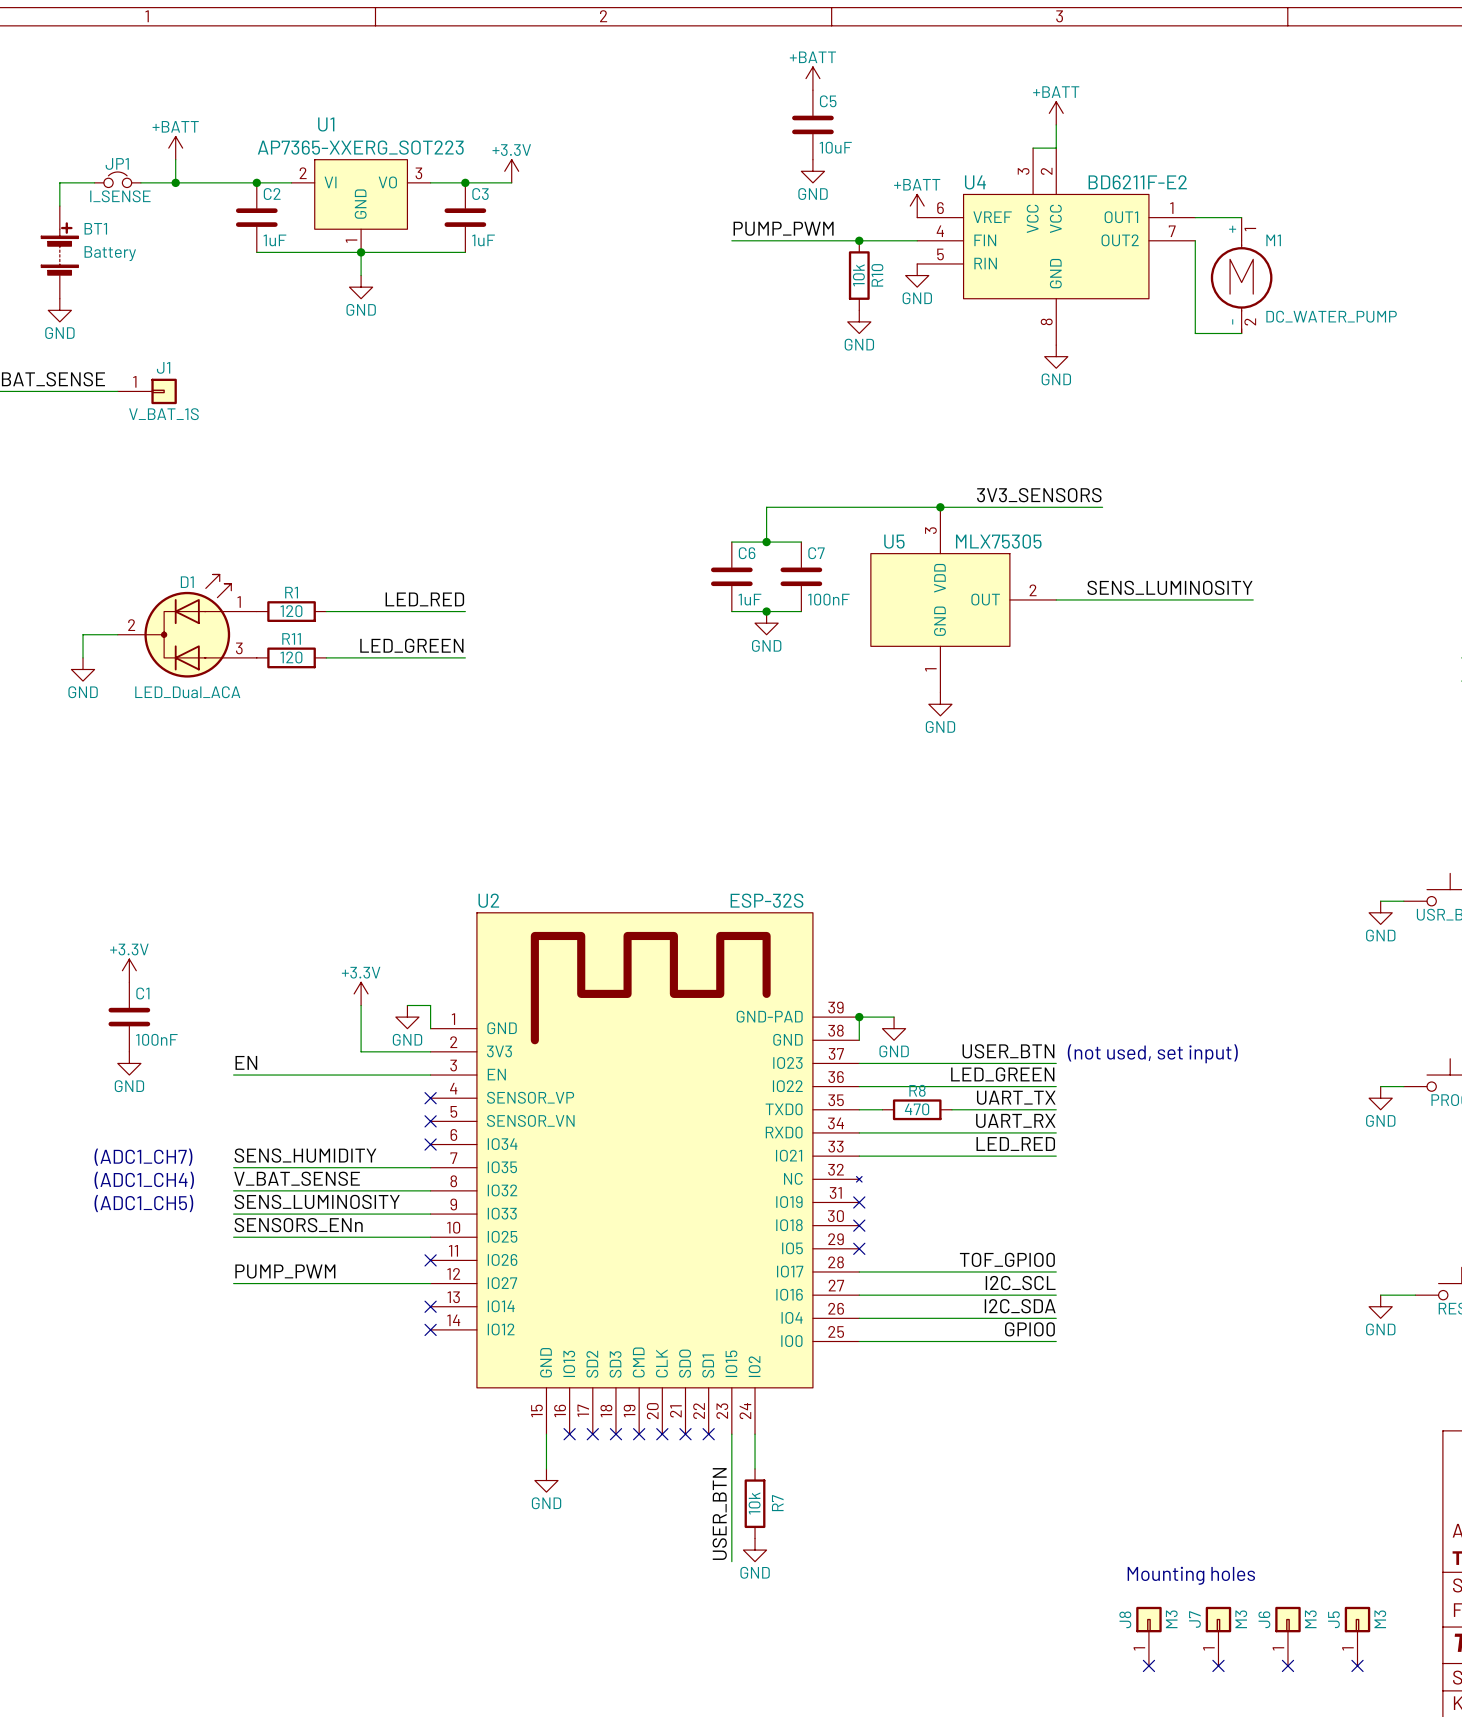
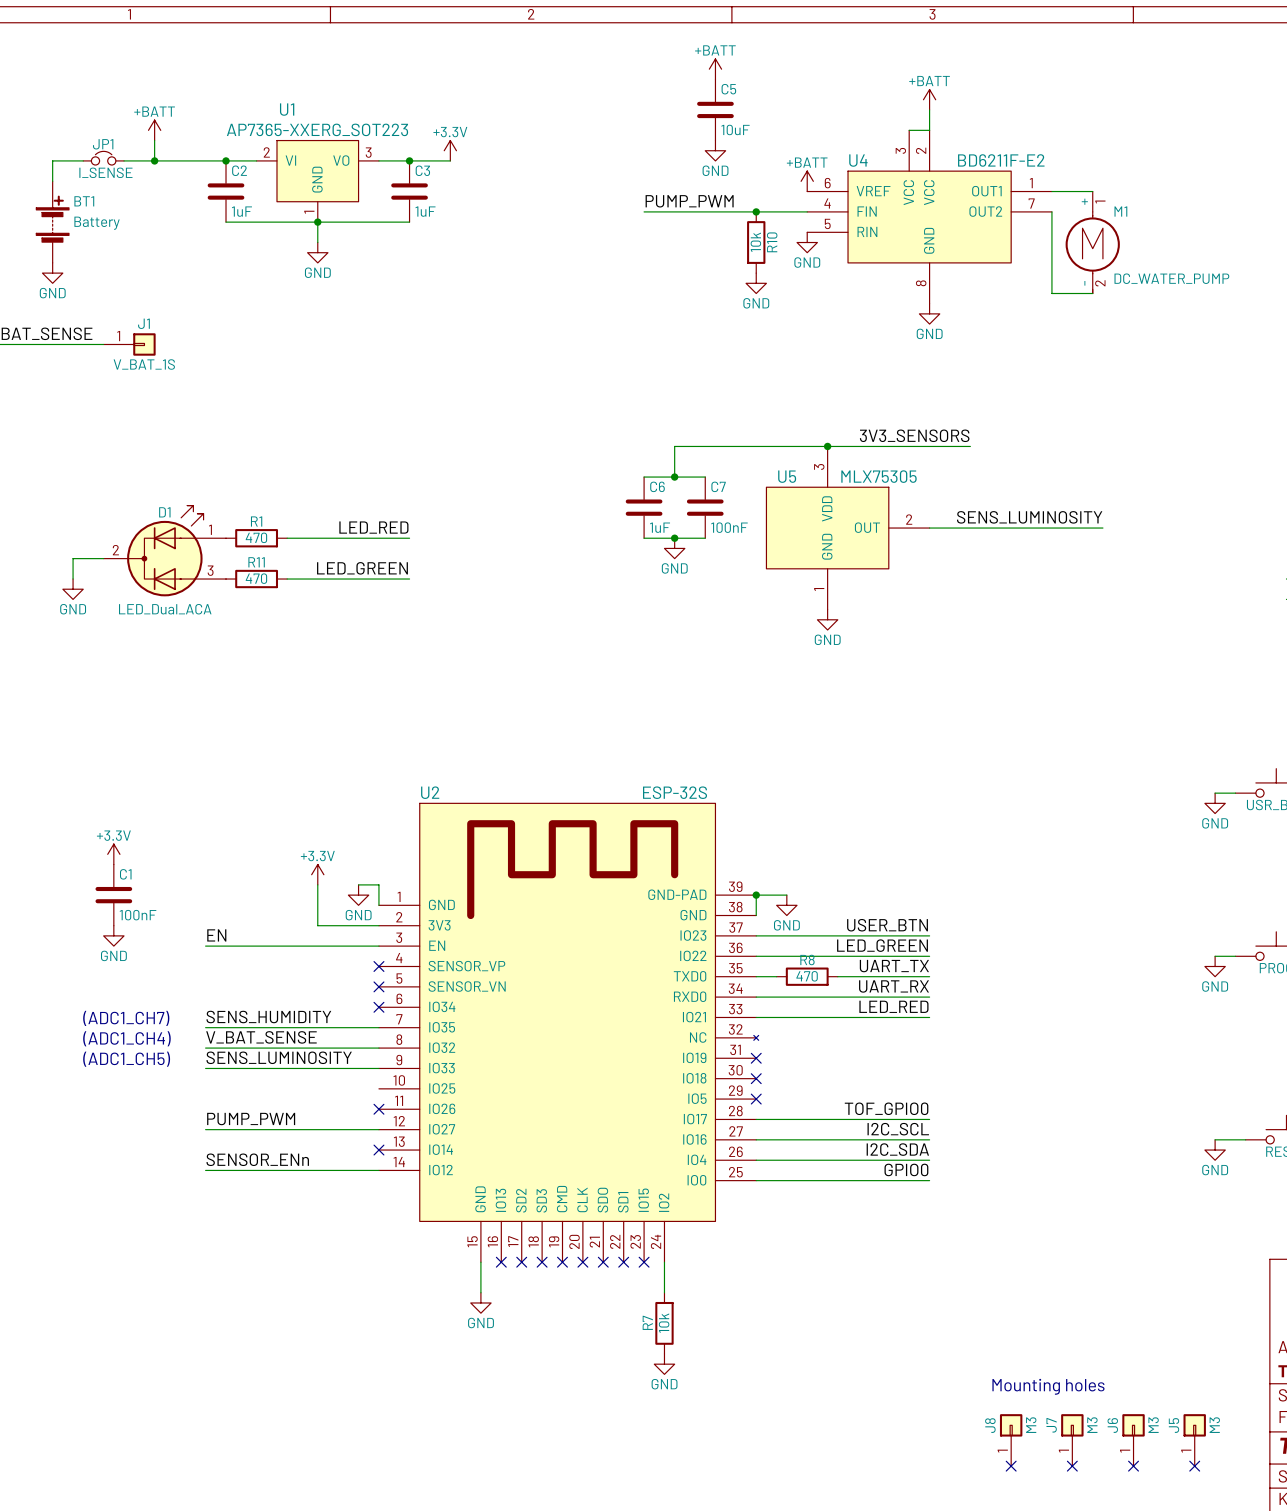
R1 value: 120 (291, 611) -> 470 (256, 537)
R11 value: 120 (291, 657) -> 470 (256, 578)
text: (not used, set input) (1152, 1053) -> none
label: SENSORS_ENn (298, 1225) -> none
wire: (233, 1237) (430, 1237) -> (205, 1170) (378, 1170)
label: none -> SENSOR_ENn (257, 1159)
no-connect mark: (430, 1329) -> none
wire: (731, 1434) (731, 1561) -> none
no-connect mark: none -> (644, 1262)
R7 name position: R7 (777, 1503) -> R7 (647, 1322)
label: USER_BTN (719, 1514) -> none

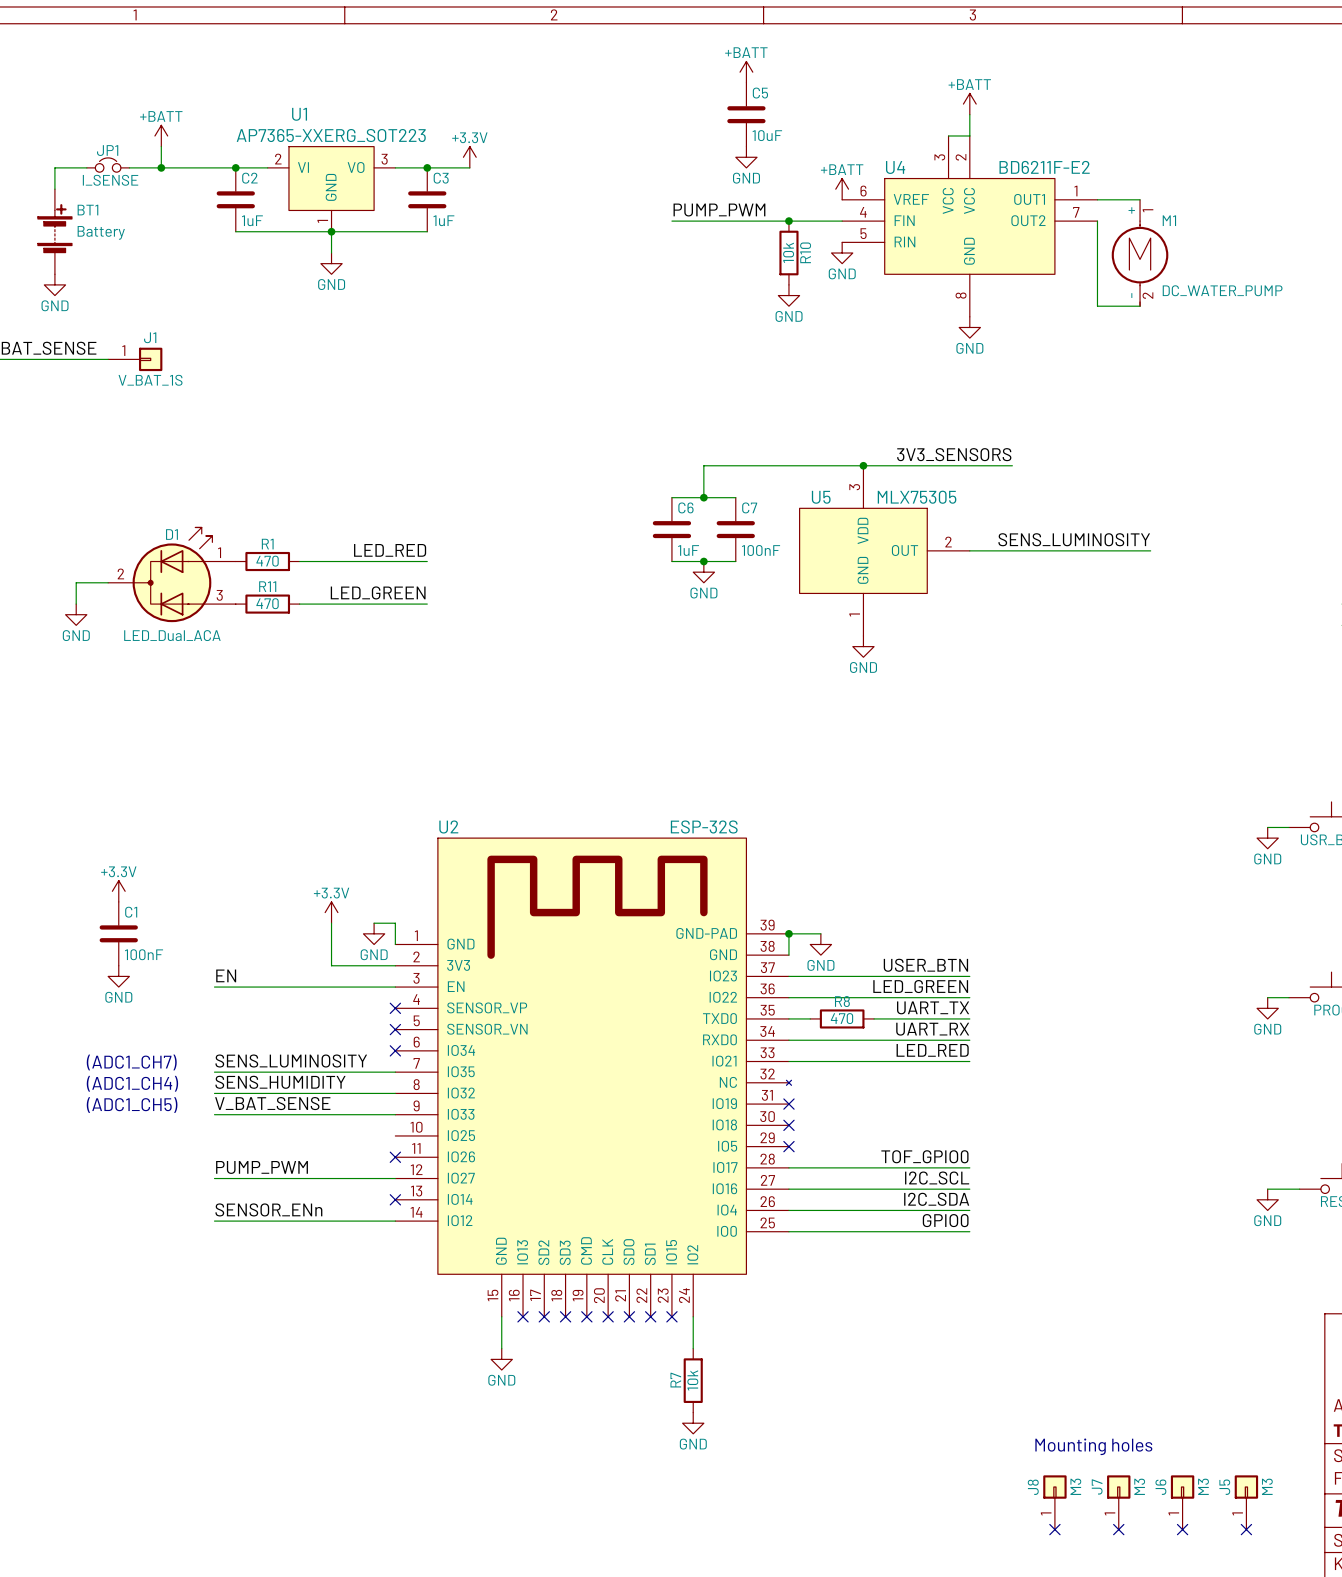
label: SENS_HUMIDITY (268, 1017) -> SENS_LUMINOSITY (291, 1061)
label: V_BAT_SENSE (261, 1037) -> SENS_HUMIDITY (280, 1082)
label: SENS_LUMINOSITY (279, 1057) -> V_BAT_SENSE (272, 1103)

